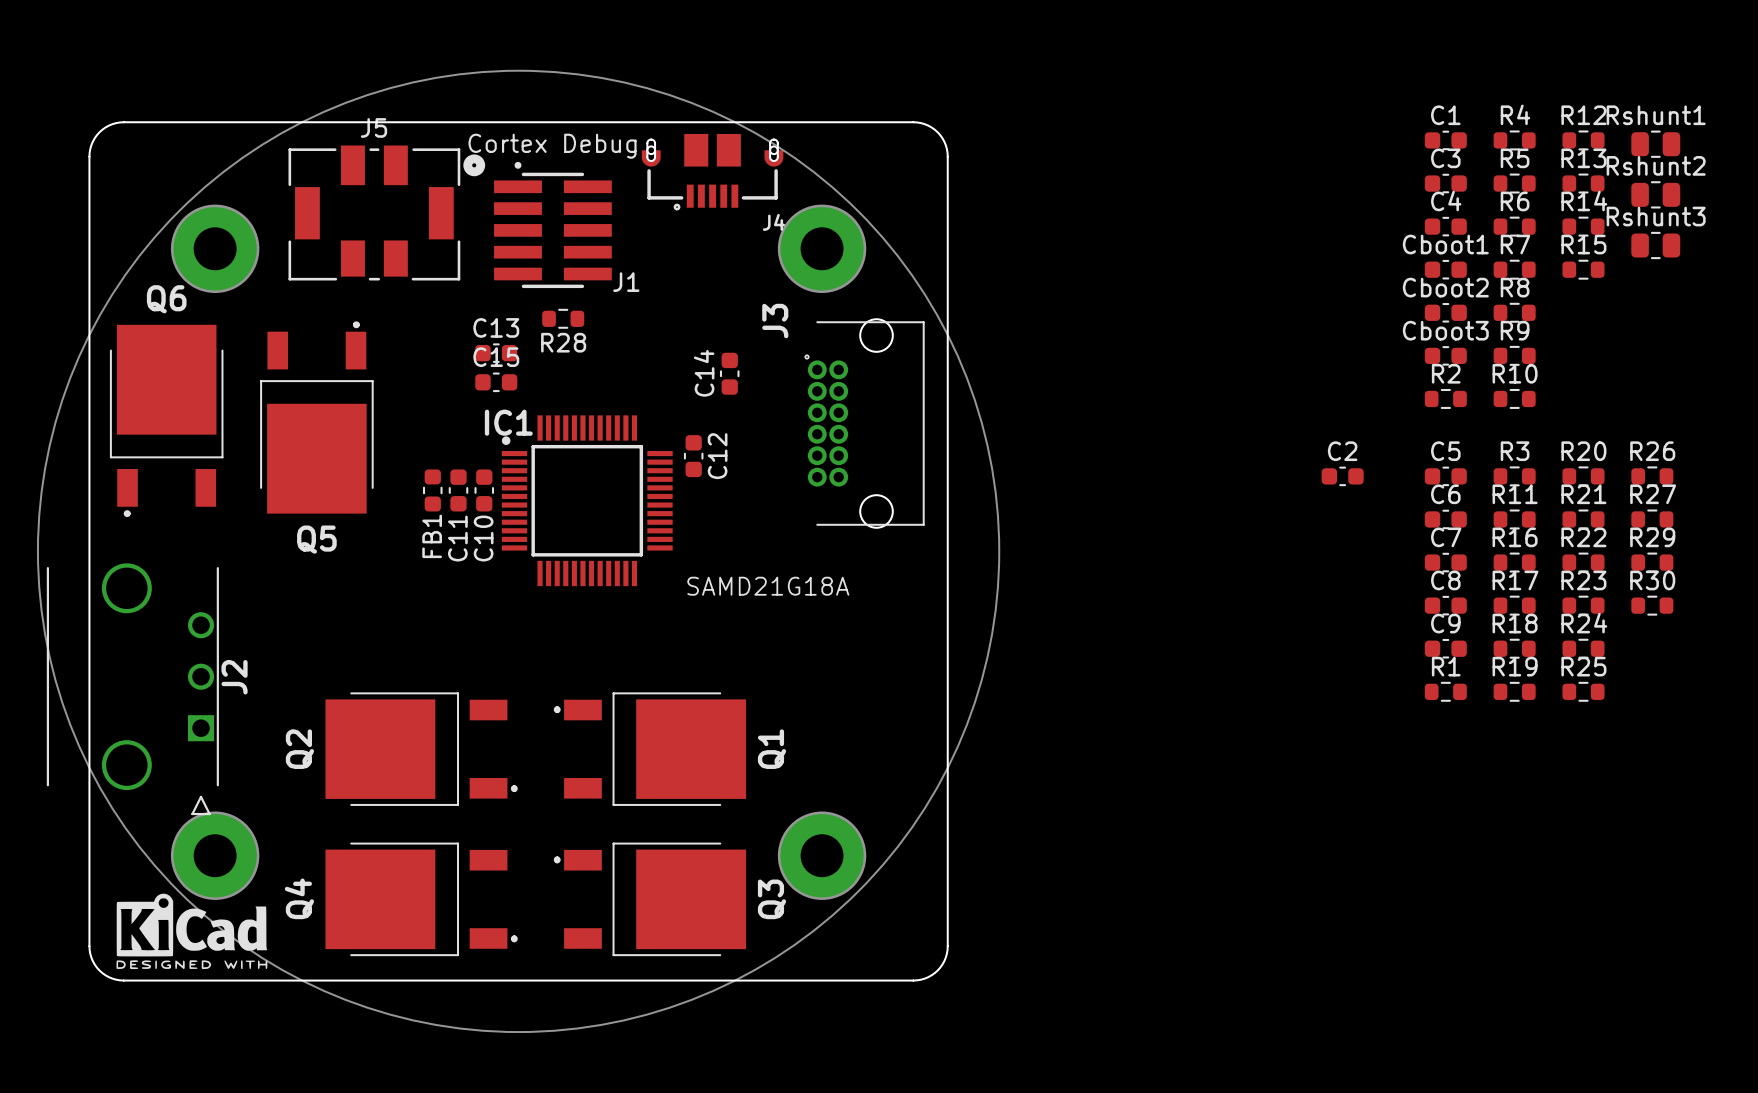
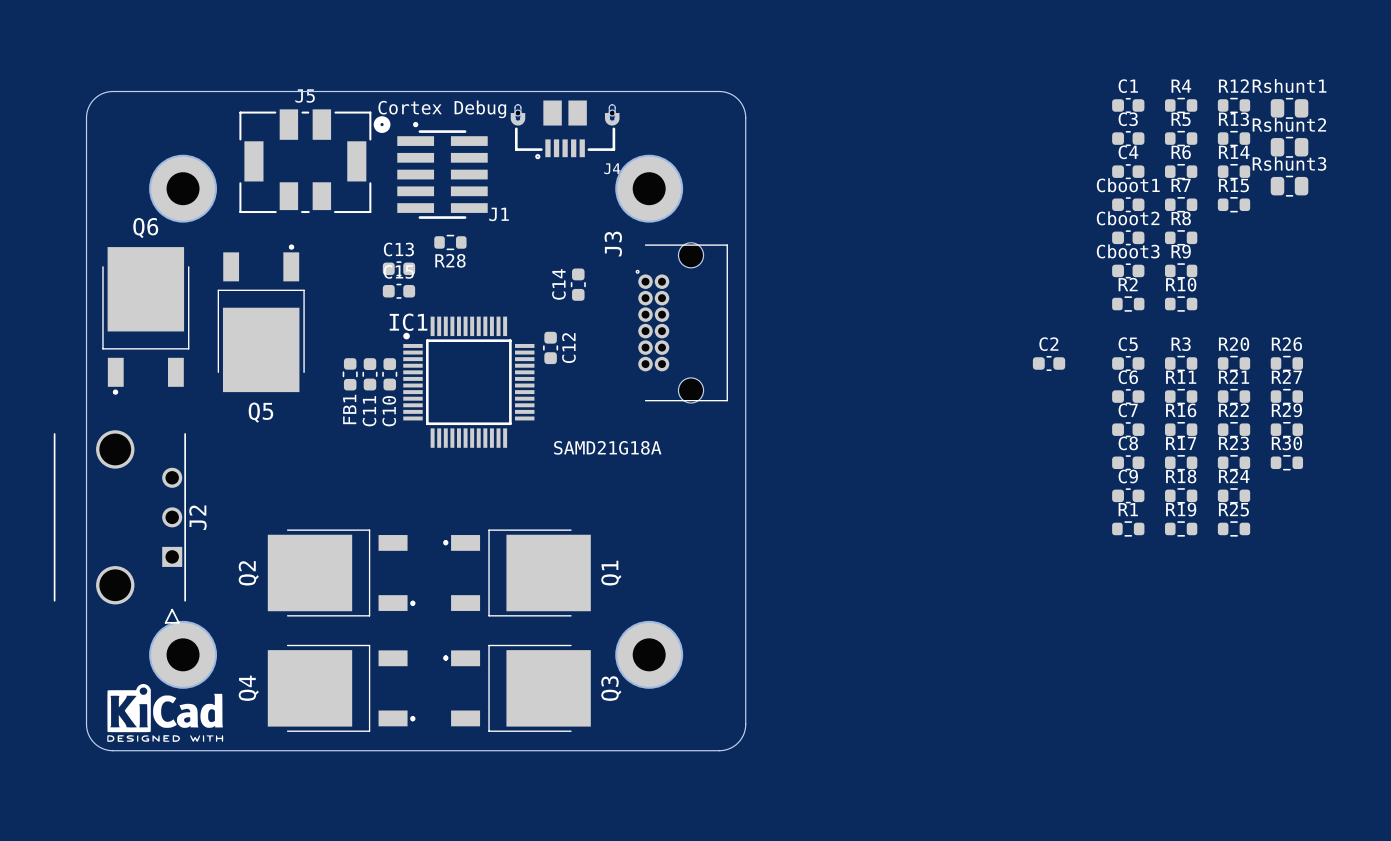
drawing: [37, 69, 1001, 1033] -> none

